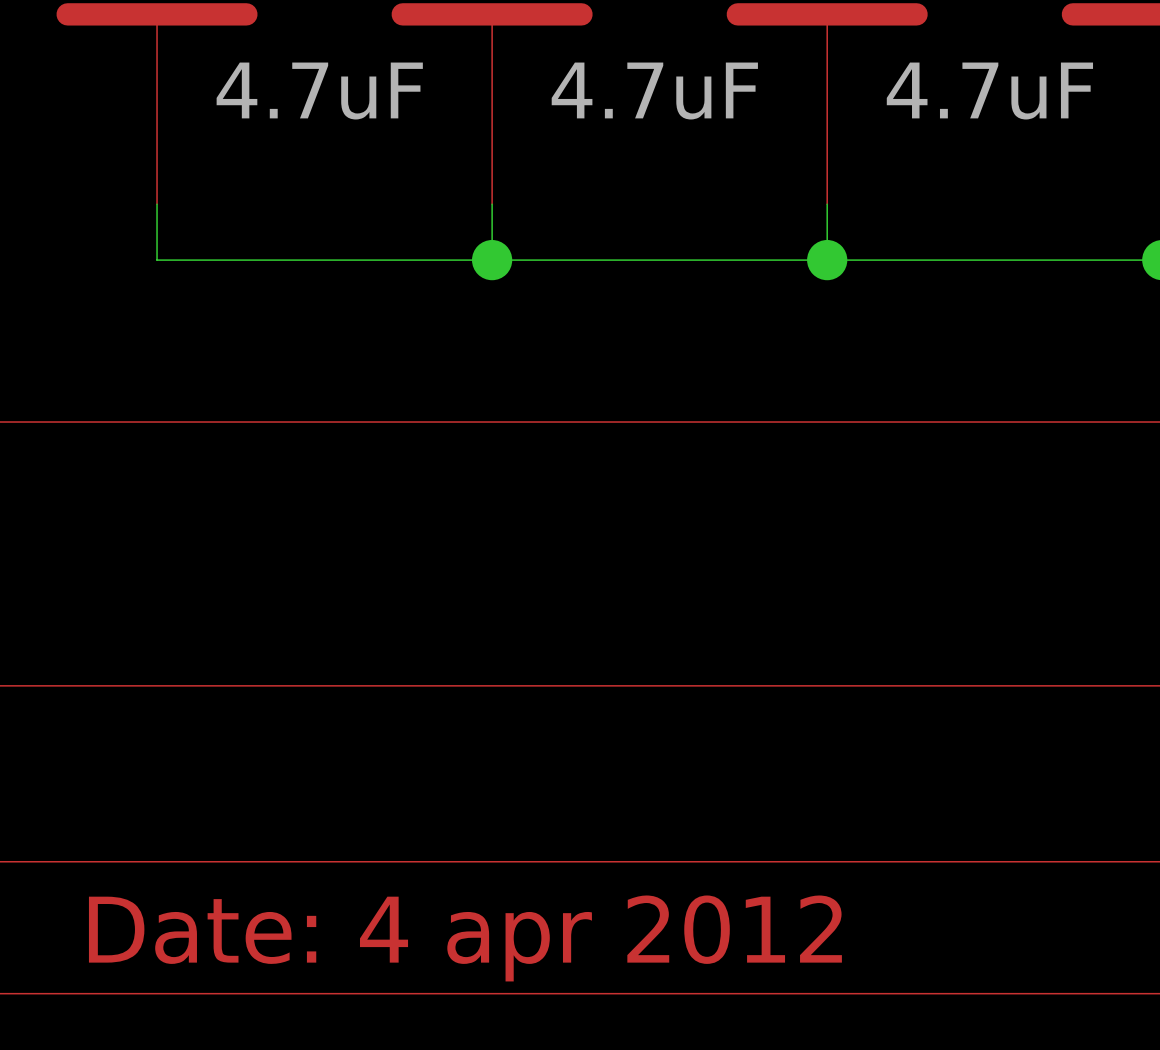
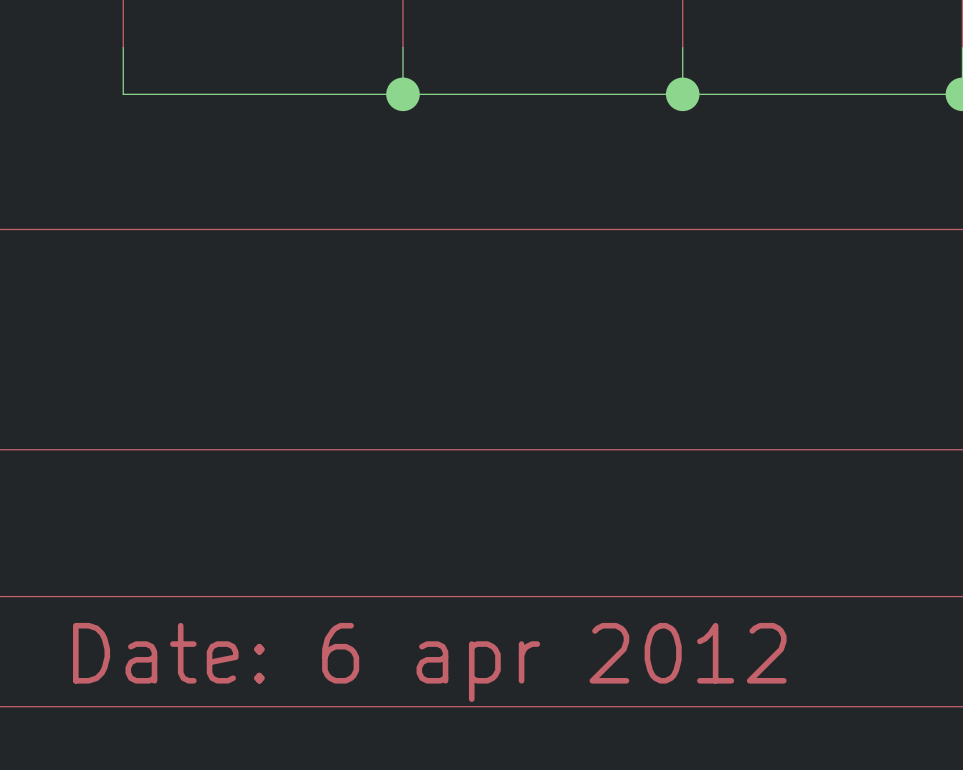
title block: Date: 4 apr 2012 (465, 938) -> Date: 6 apr 2012 (429, 662)

